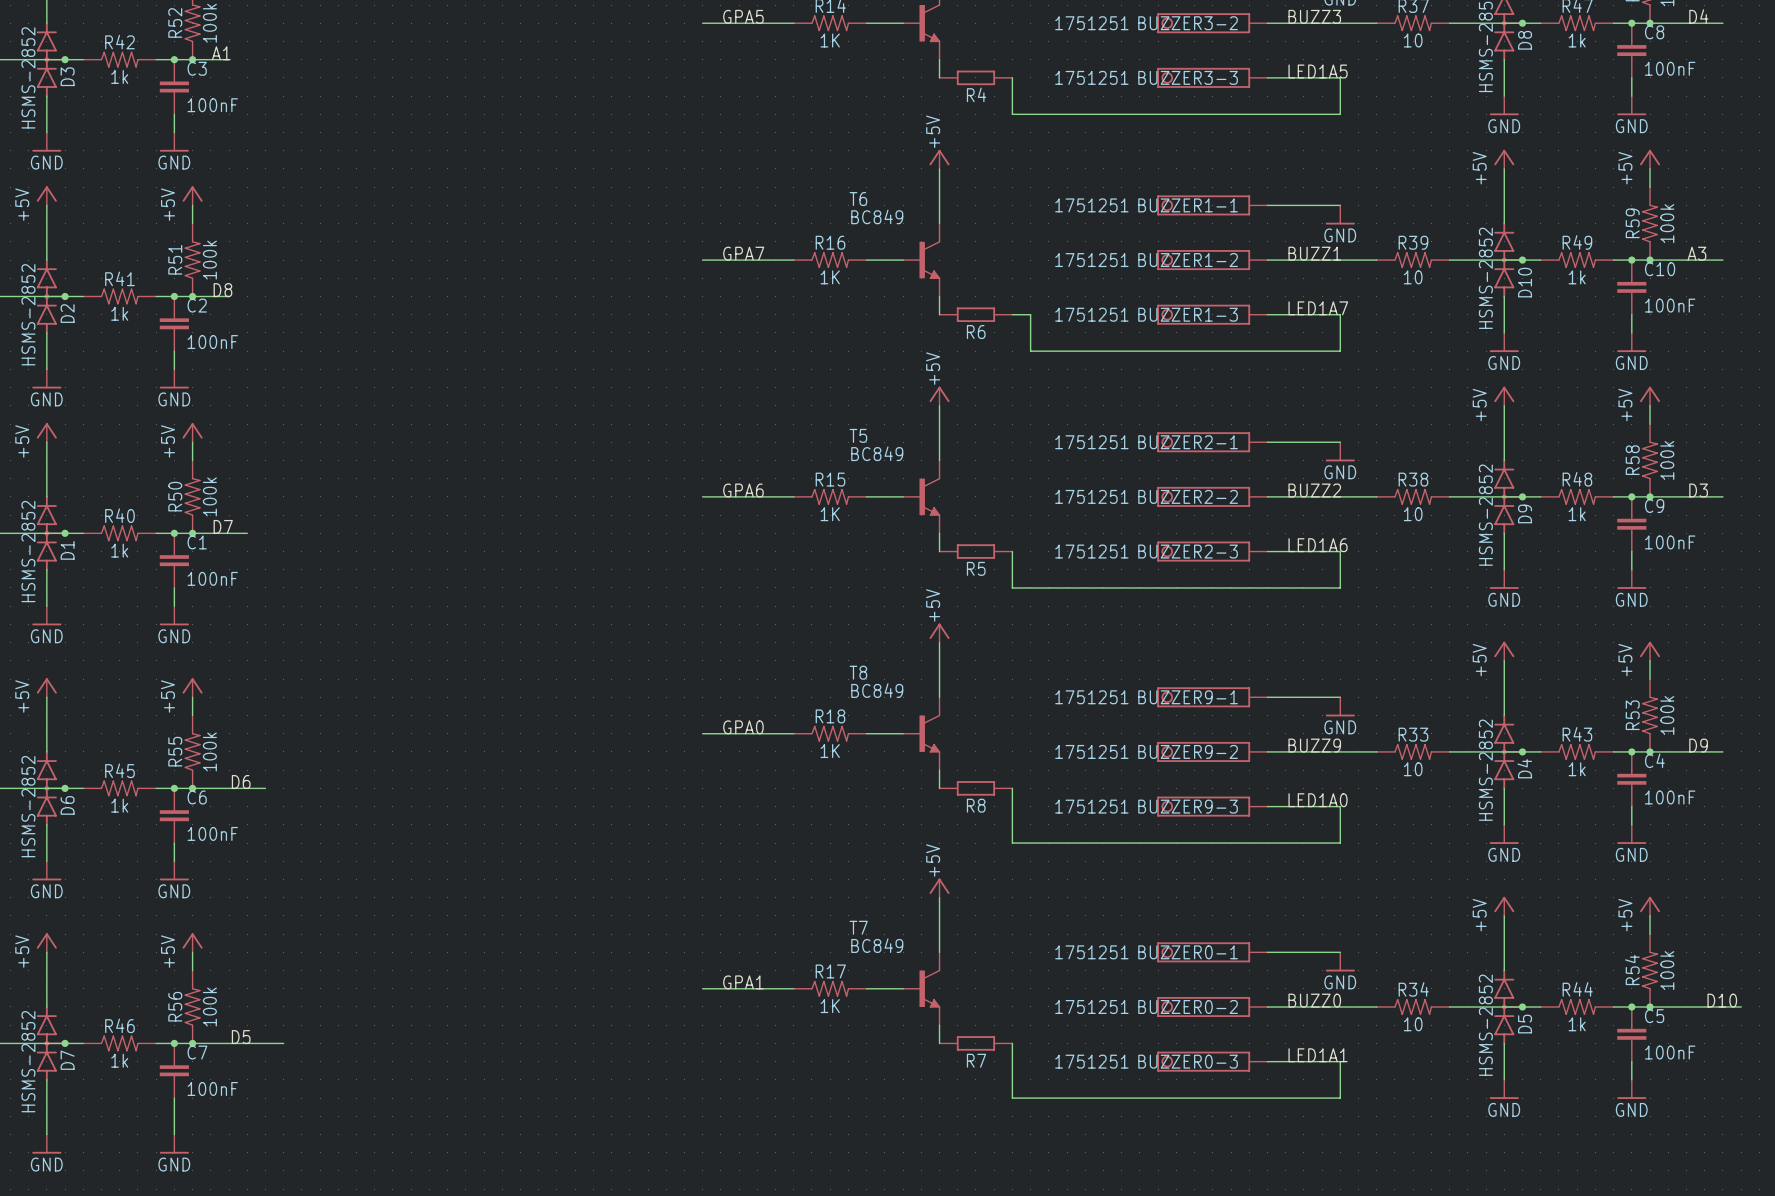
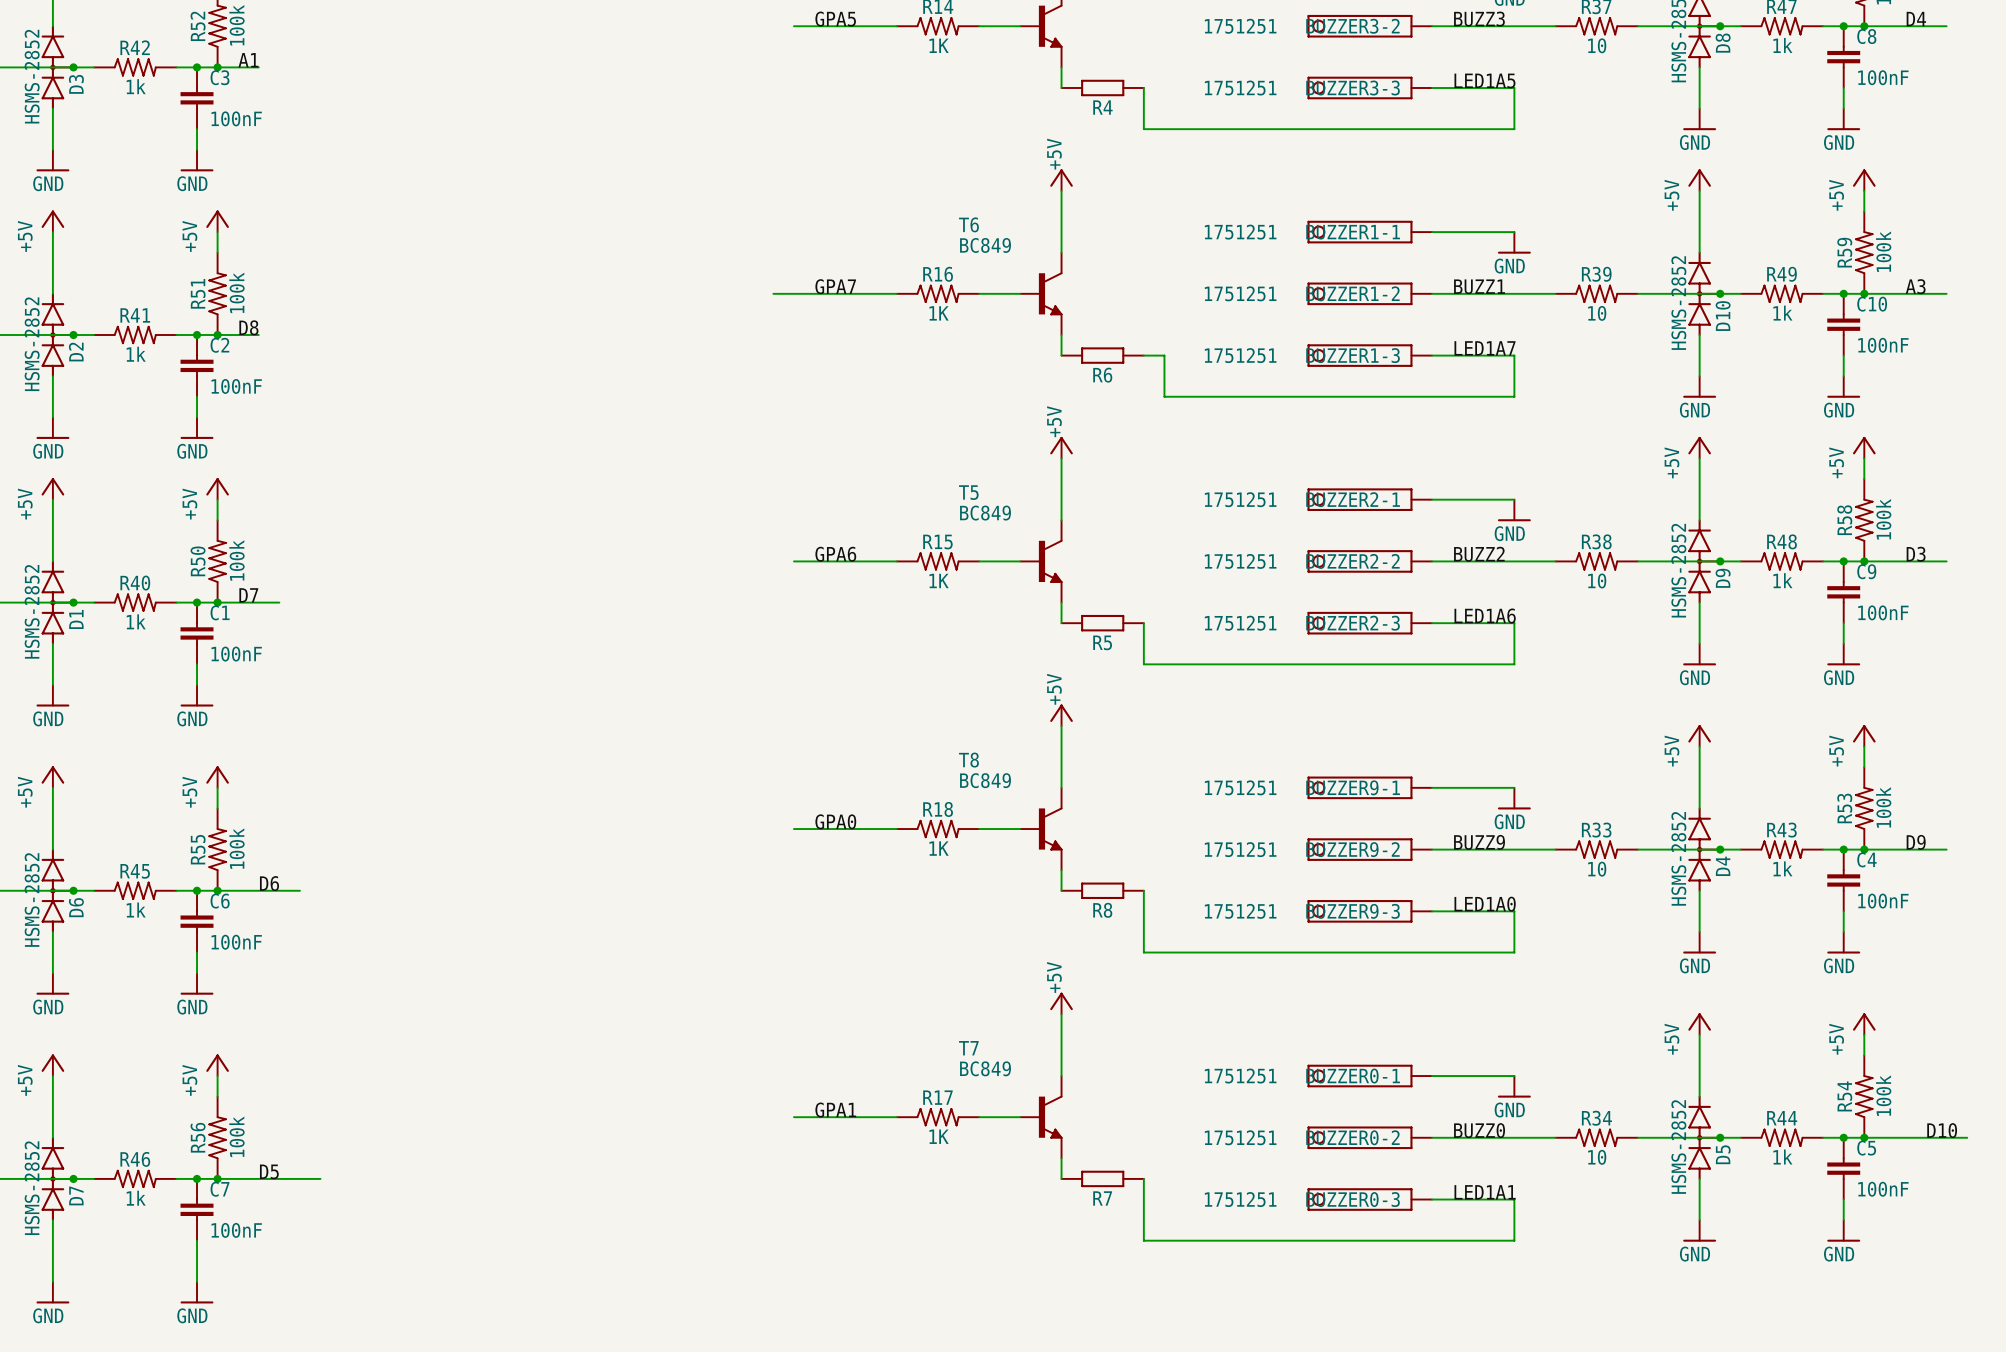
wire: none -> (773, 293) (793, 293)

